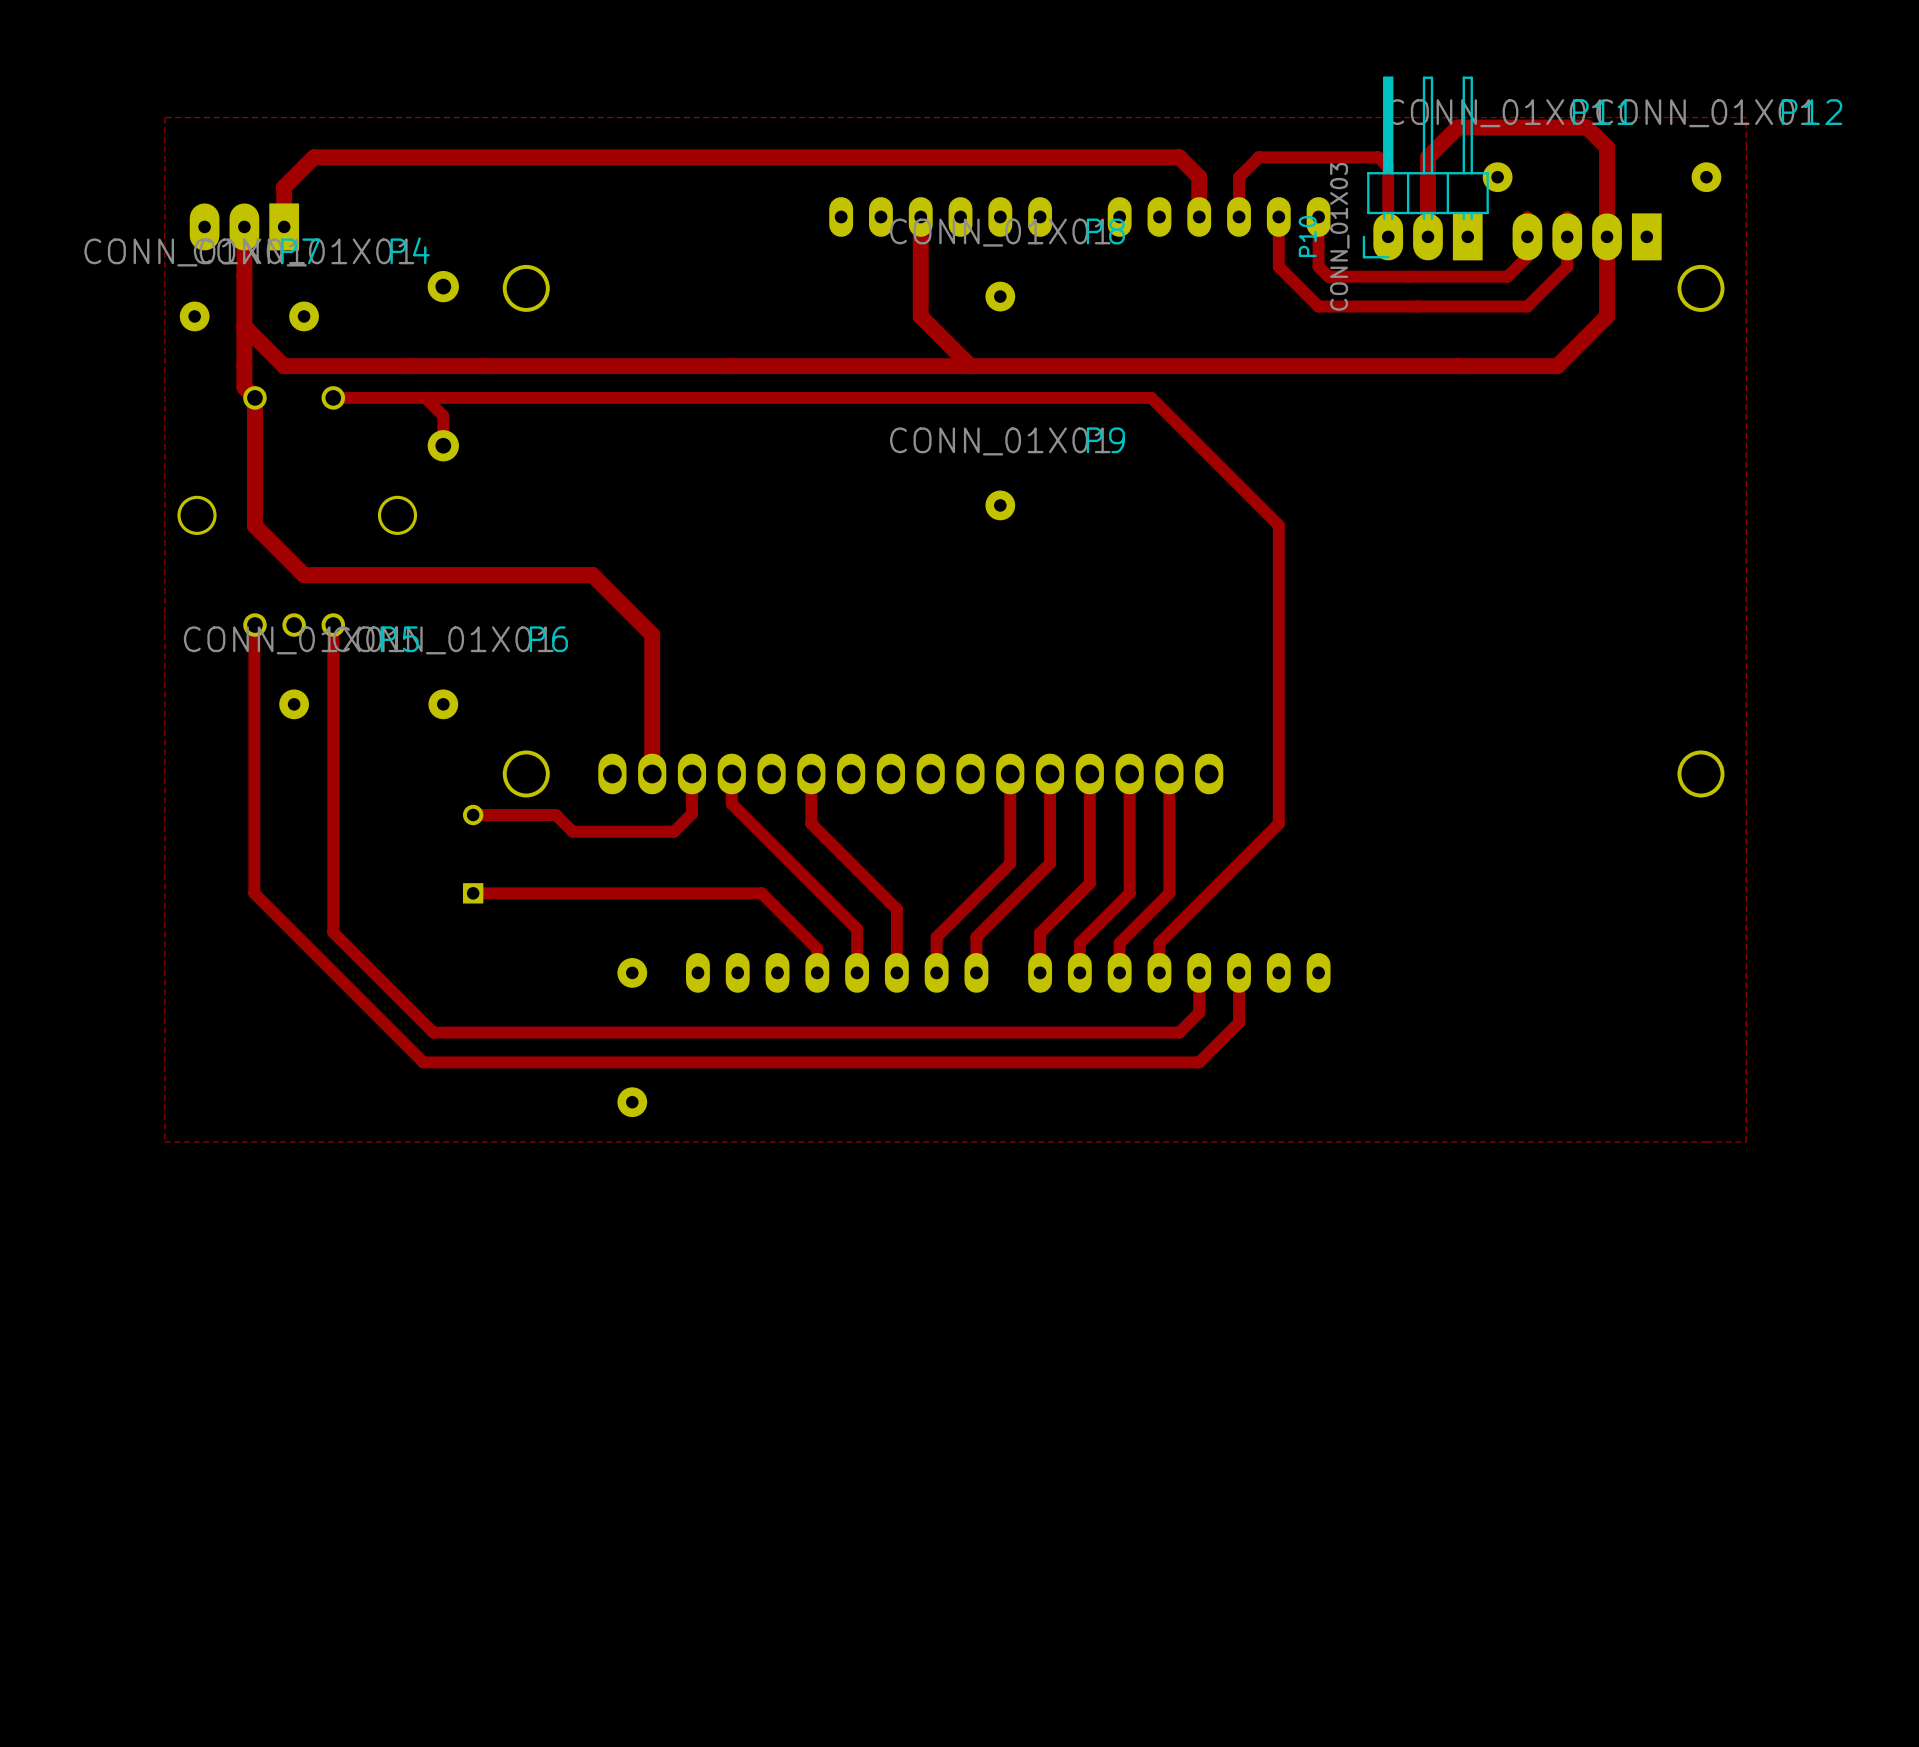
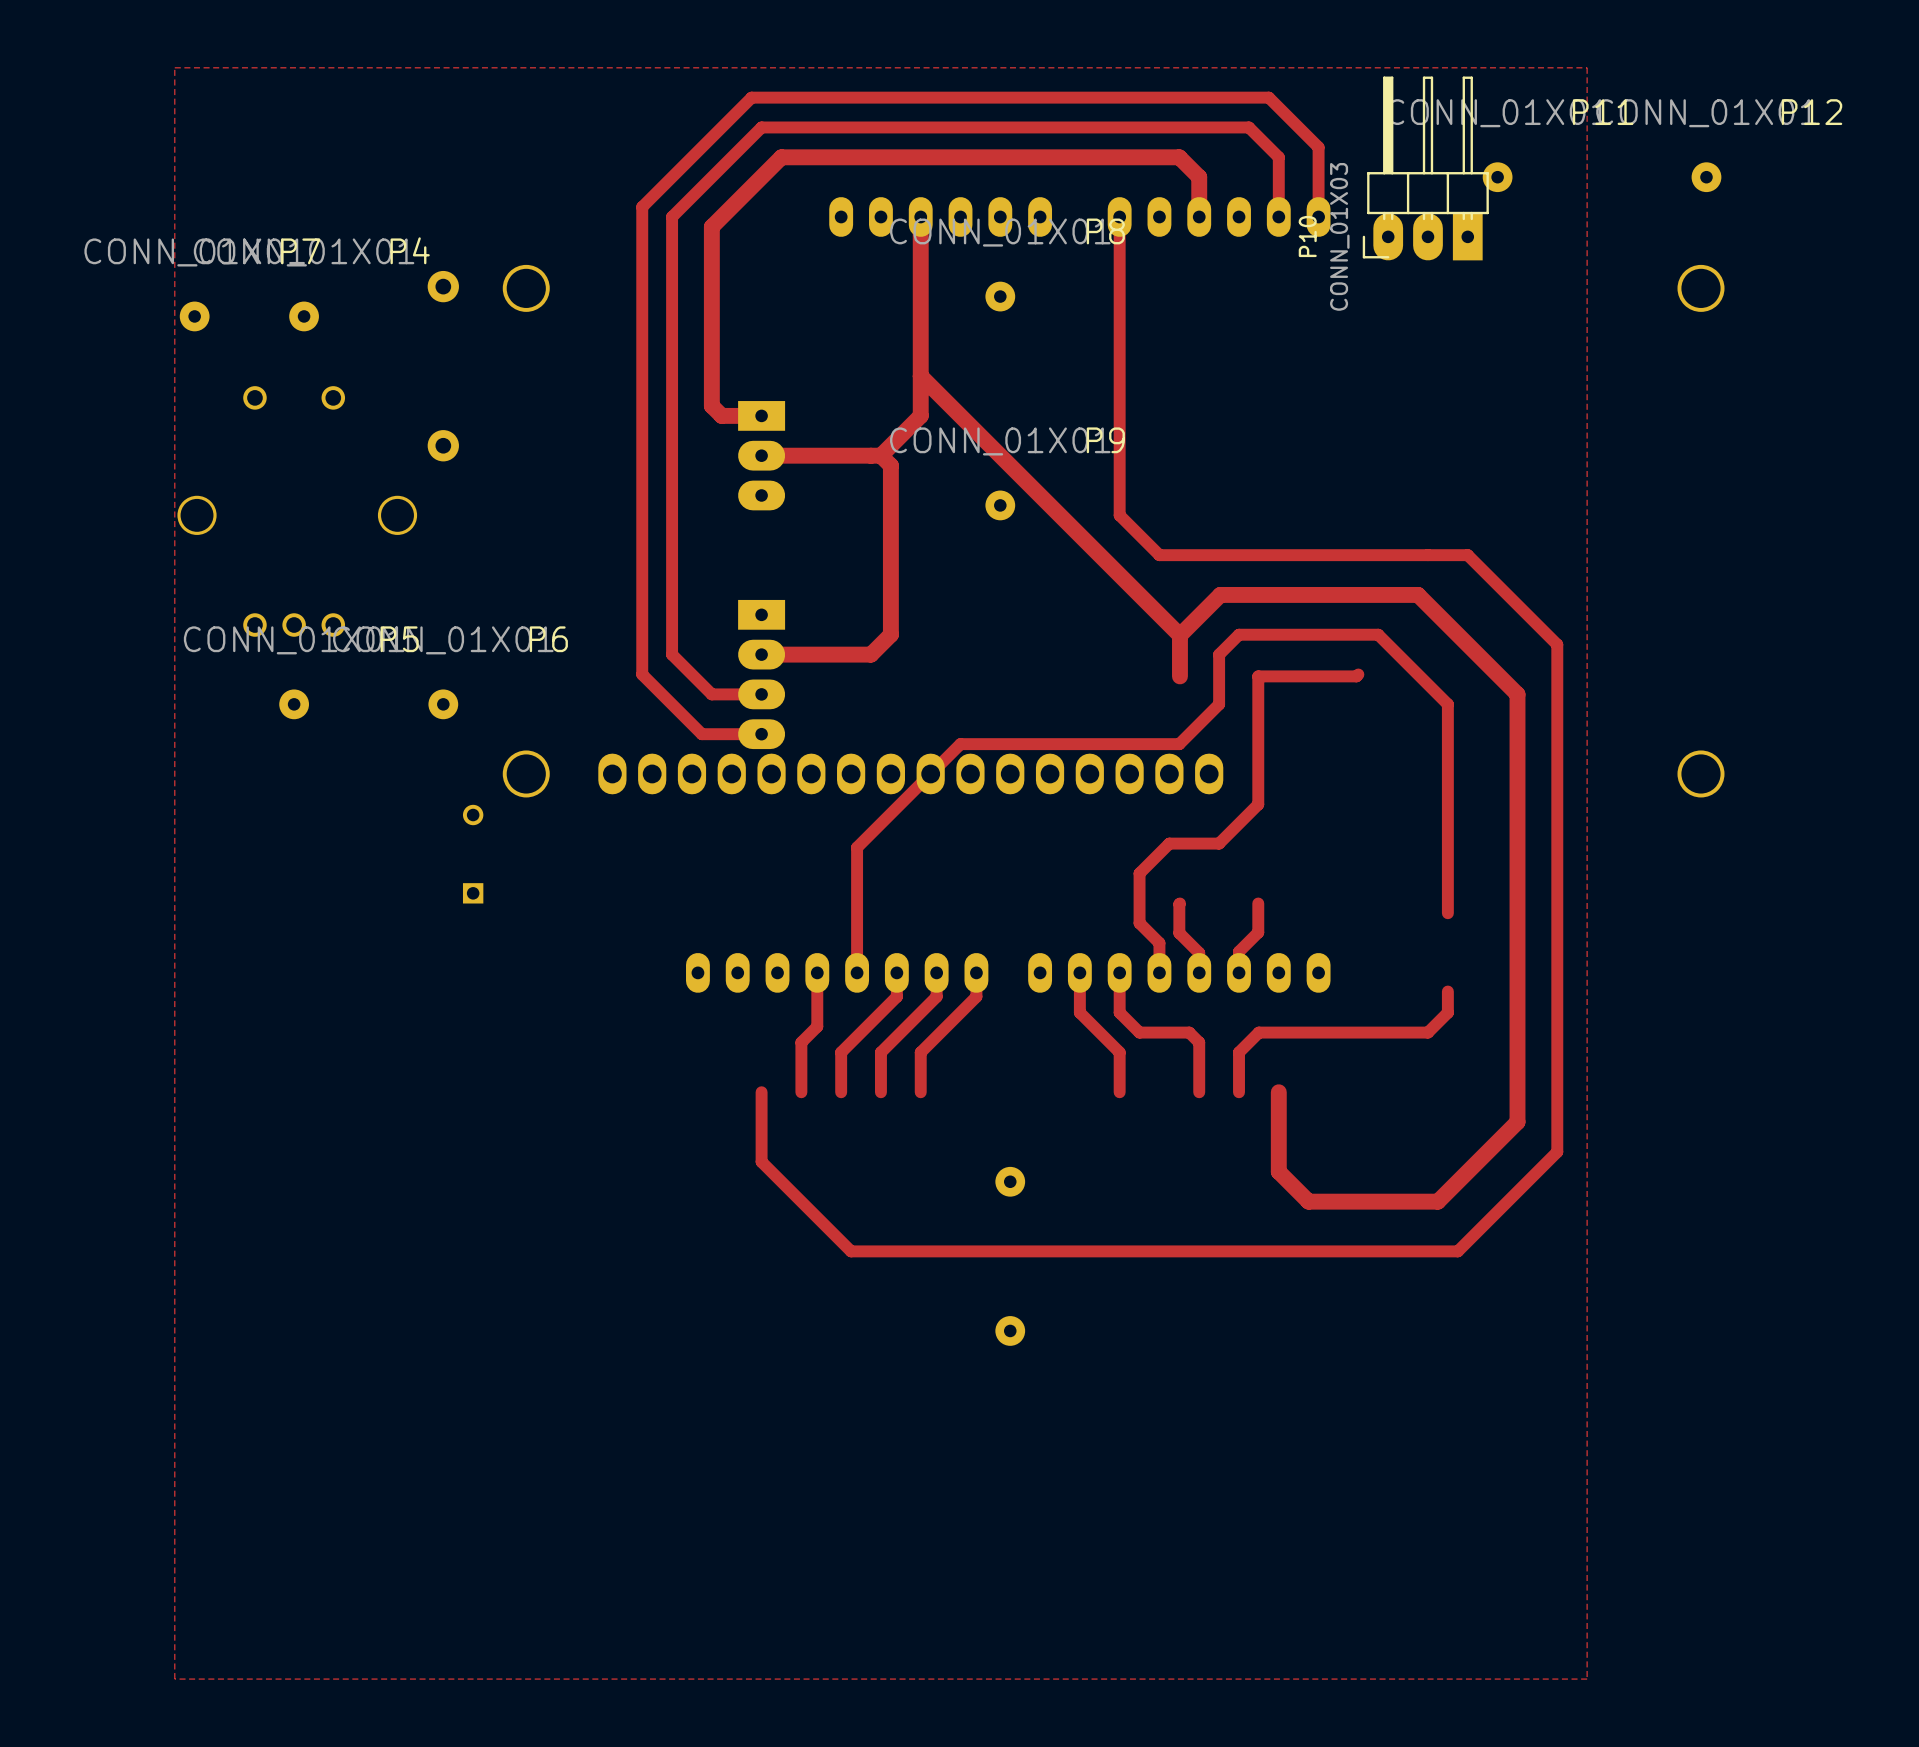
zone outline: (164, 117) (1746, 117) (1746, 1141) (164, 1141) (164, 117) -> (174, 67) (174, 1679) (1587, 1679) (1587, 67) (174, 67)
track: (781, 157) (314, 157) (284, 187) (284, 226) -> (781, 157) (711, 226) (711, 405) (721, 415) (761, 415)
track: none -> (1119, 216) (1119, 515) (1159, 555) (1467, 555) (1557, 644) (1557, 1151) (1457, 1251) (851, 1251) (761, 1161) (761, 1092)
track: (1239, 216) (1239, 177) (1258, 157) (1378, 157) (1388, 167) (1388, 216) -> none
track: (1278, 216) (1278, 266) (1318, 306) (1527, 306) (1567, 266) (1567, 216) -> (1278, 216) (1278, 157) (1248, 127) (761, 127) (672, 216) (672, 654) (711, 694) (761, 694)
track: (1318, 216) (1318, 266) (1328, 276) (1507, 276) (1527, 256) (1527, 216) -> (1318, 216) (1318, 147) (1268, 97) (751, 97) (642, 207) (642, 674) (701, 734) (761, 734)
track: (1427, 216) (1427, 157) (1457, 127) (1587, 127) (1607, 147) (1607, 316) (1557, 366) (284, 366) (244, 326) -> none
track: (244, 226) (244, 387) (254, 397) (254, 525) (304, 575) (592, 575) (652, 634) (652, 773) -> none
part: (244, 226) -> none
part: (1587, 236) -> none
track: (920, 316) (970, 366) -> (920, 316) (920, 415) (880, 455)
track: none -> (920, 376) (1179, 635)
track: (333, 397) (1151, 397) (1278, 525) (1278, 823) (1159, 943) -> (1358, 674) (1356, 676) (1258, 676) (1258, 804) (1219, 843) (1169, 843) (1139, 873) (1139, 923) (1159, 943)
track: (425, 397) (443, 415) (443, 445) -> none
track: none -> (761, 455) (880, 455)
part: none -> (761, 455)
track: none -> (880, 455) (890, 465) (890, 634) (871, 654) (761, 654)
track: (254, 625) (254, 893) (423, 1062) (1199, 1062) (1239, 1022) (1239, 972) -> (1258, 903) (1258, 932) (1239, 951) (1239, 972)
track: (333, 625) (333, 932) (433, 1032) (1139, 1032) -> none
track: none -> (1179, 635) (1220, 594) (1418, 594) (1517, 694) (1517, 1122) (1437, 1201) (1308, 1201) (1278, 1171) (1278, 1092)
track: none -> (1179, 635) (1179, 676)
part: none -> (761, 674)
track: (691, 773) (691, 813) (674, 831) (572, 831) (555, 815) (473, 815) -> none
track: (731, 773) (731, 803) (857, 929) -> (1447, 913) (1447, 704) (1378, 634) (1239, 634) (1219, 654) (1219, 704) (1179, 744) (960, 744) (857, 847) (857, 929)
track: (811, 773) (811, 823) (896, 909) (896, 972) -> (841, 1092) (841, 1052) (896, 996) (896, 972)
track: (1010, 773) (1010, 863) (936, 937) (936, 972) -> (880, 1092) (880, 1052) (936, 996) (936, 972)
track: (1050, 773) (1050, 863) (976, 937) (976, 972) -> (920, 1092) (920, 1052) (976, 996) (976, 972)
track: (1089, 773) (1089, 883) (1040, 933) (1040, 972) -> none
track: (1129, 773) (1129, 893) (1079, 943) (1079, 972) -> (1119, 1092) (1119, 1052) (1079, 1012) (1079, 972)
track: (1169, 773) (1169, 893) (1119, 943) (1119, 972) -> (1139, 1032) (1119, 1012) (1119, 972)
track: (473, 893) (761, 893) (817, 949) (817, 972) -> (801, 1092) (801, 1042) (817, 1026) (817, 972)
track: none -> (1179, 903) (1179, 933) (1199, 953) (1199, 972)
part: (632, 972) -> none
track: (1199, 972) (1199, 1012) (1179, 1032) -> (1199, 1092) (1199, 1042) (1189, 1032) (1179, 1032)
track: none -> (1447, 991) (1447, 1012) (1427, 1032) (1258, 1032) (1239, 1052) (1239, 1092)
part: (632, 1102) -> none
part: none -> (1010, 1181)
part: none -> (1010, 1330)

